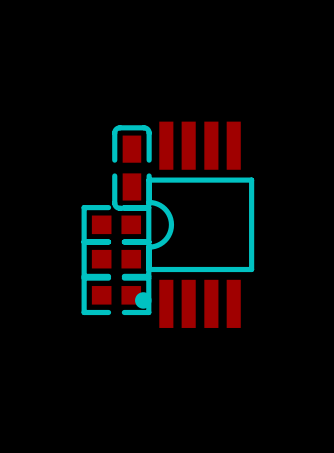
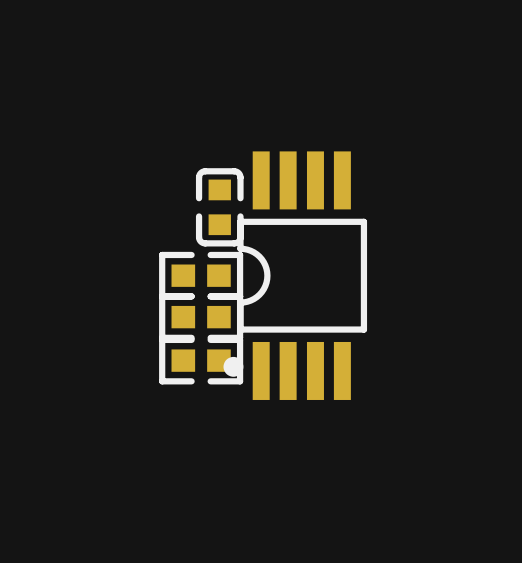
part footprint: [112, 125, 152, 211] -> [195, 168, 244, 247]

